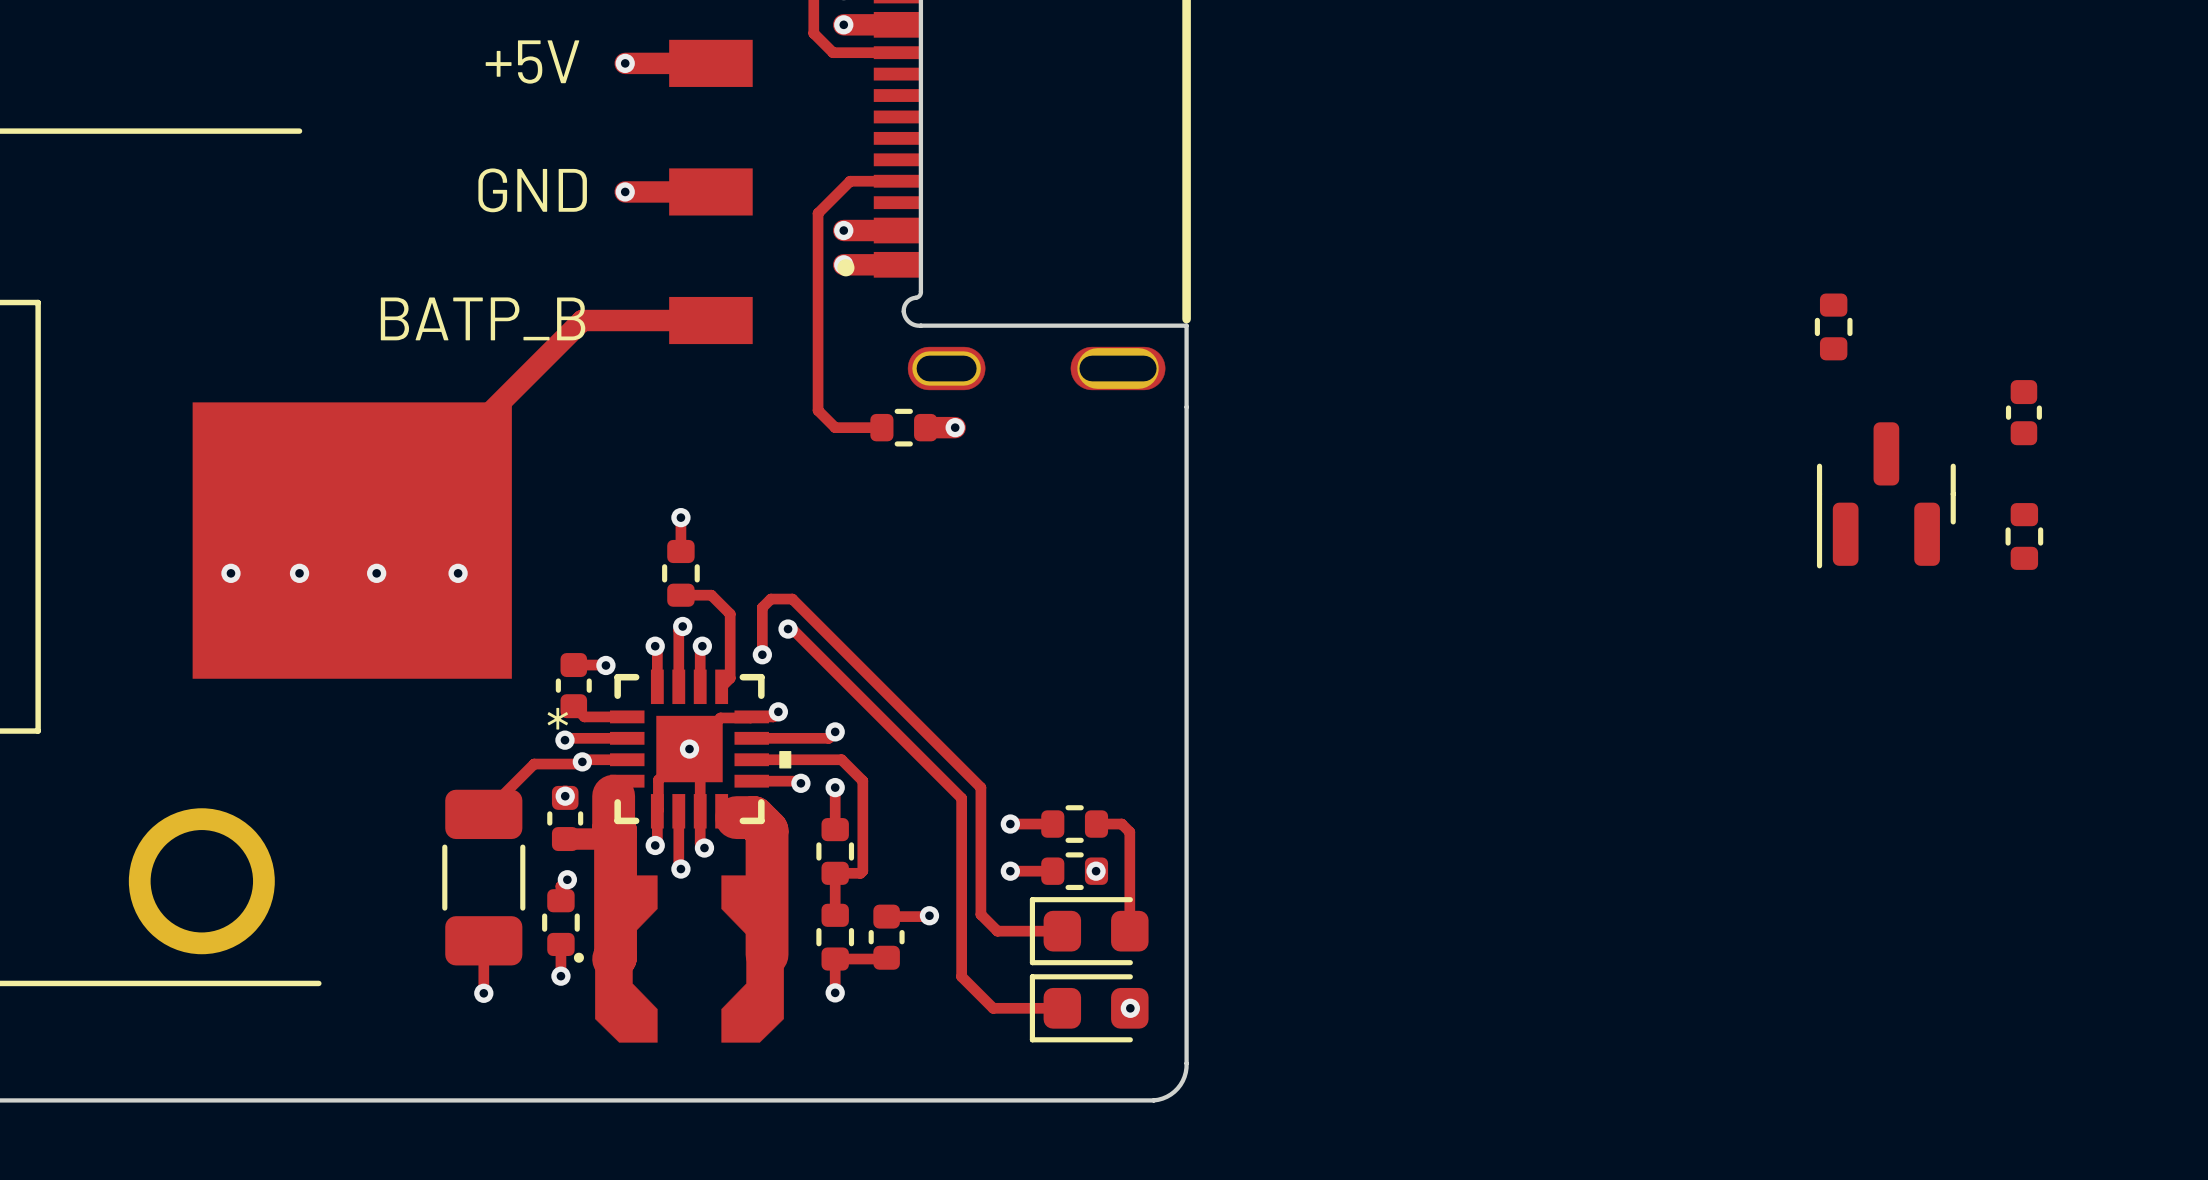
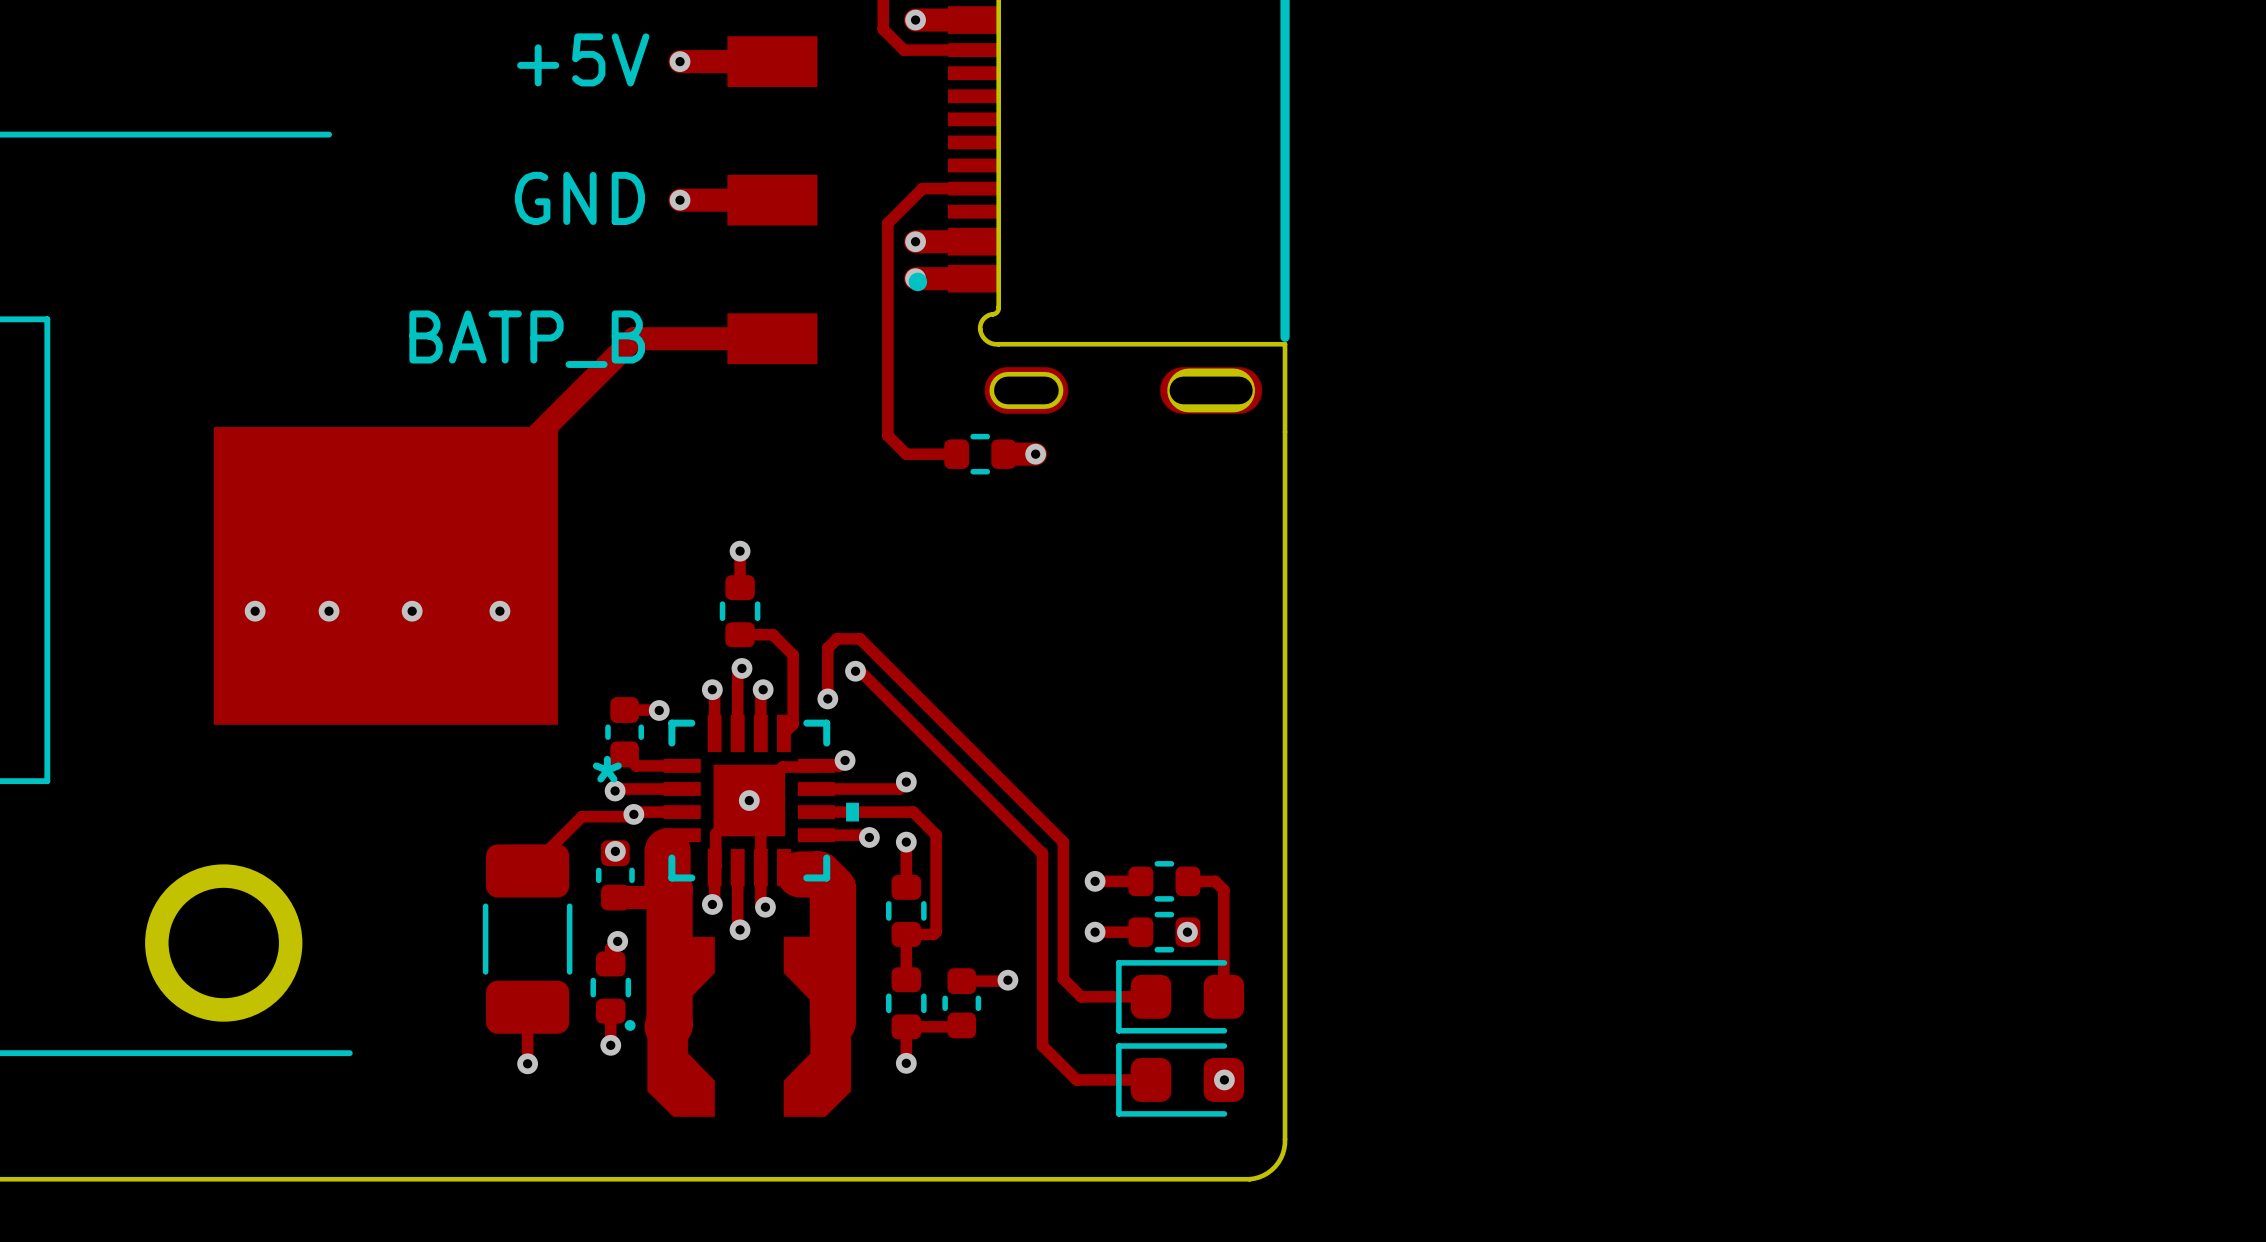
part: (1833, 326) -> none
part: (2023, 412) -> none
part: (1886, 495) -> none
part: (2024, 536) -> none

